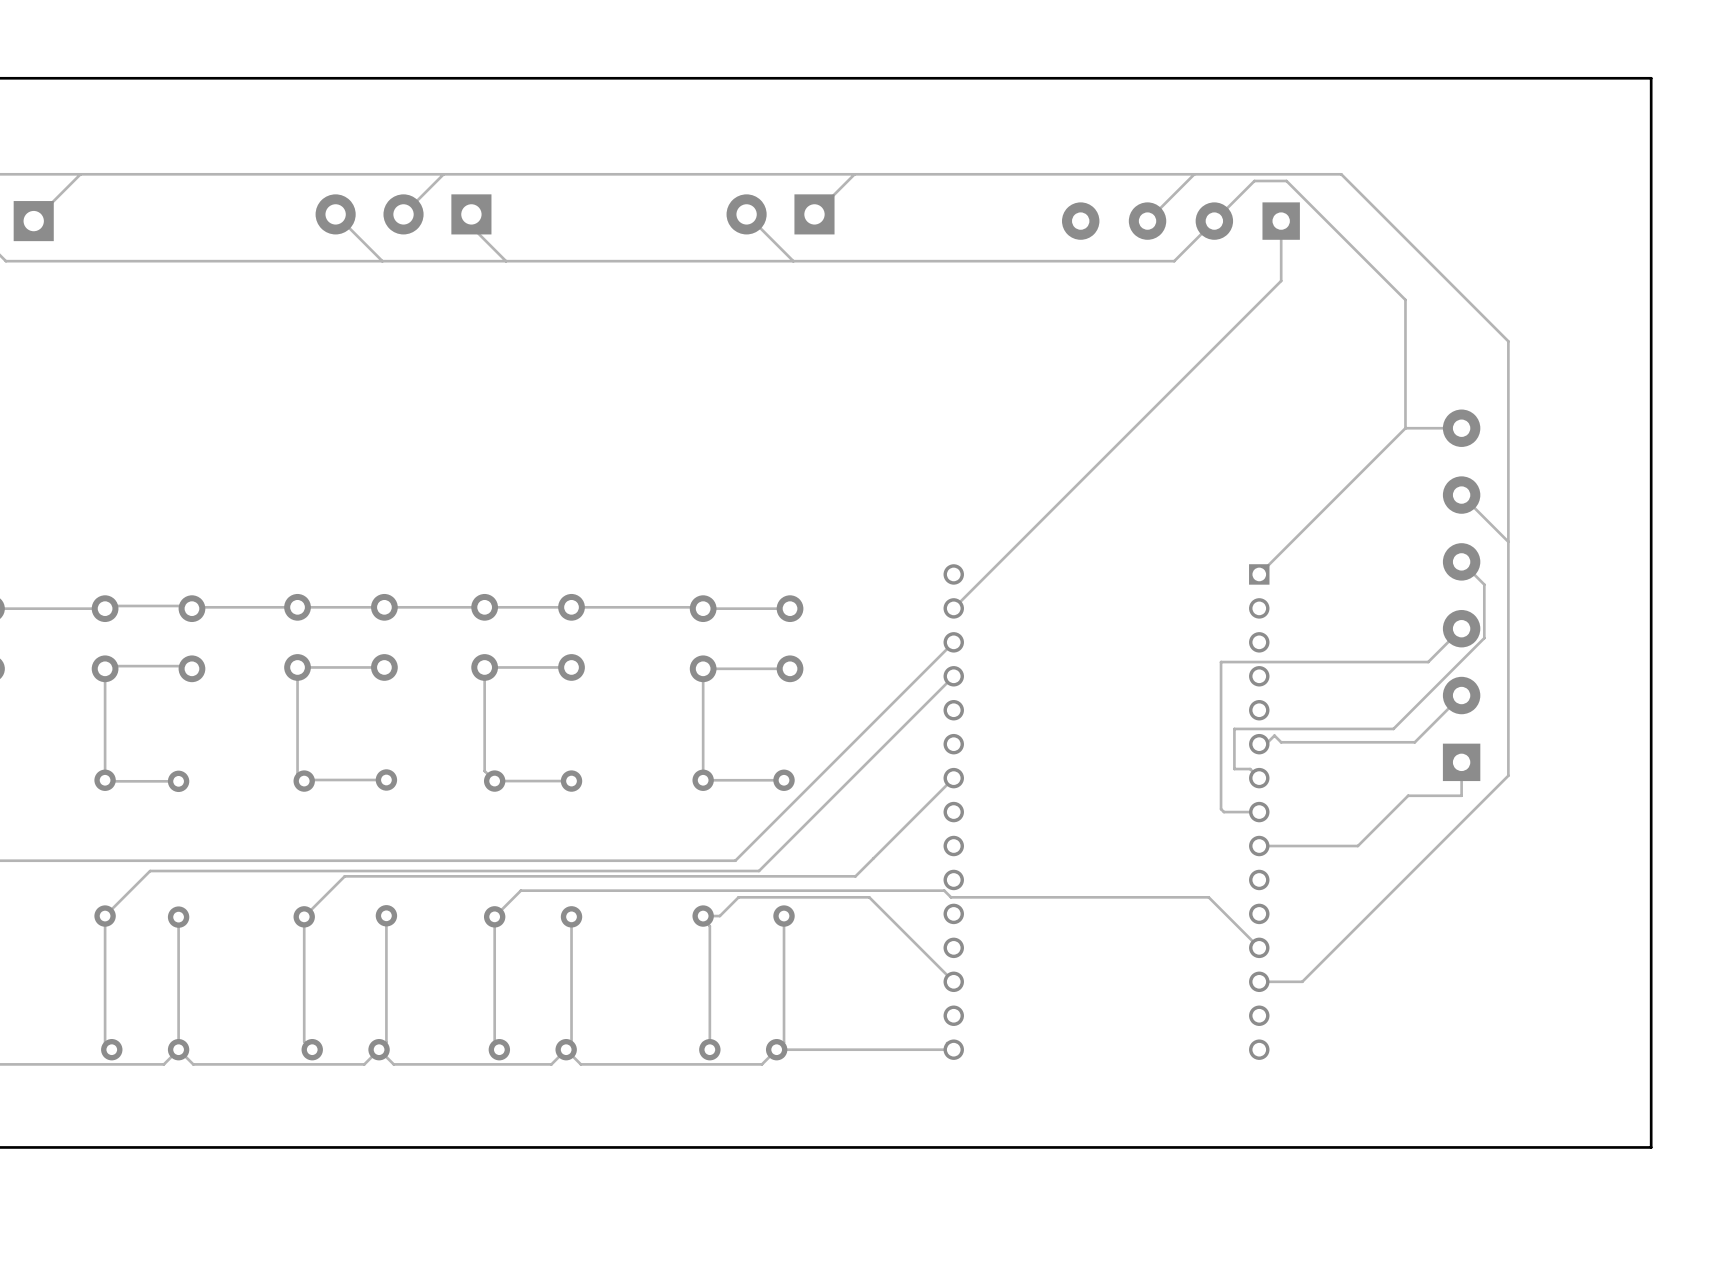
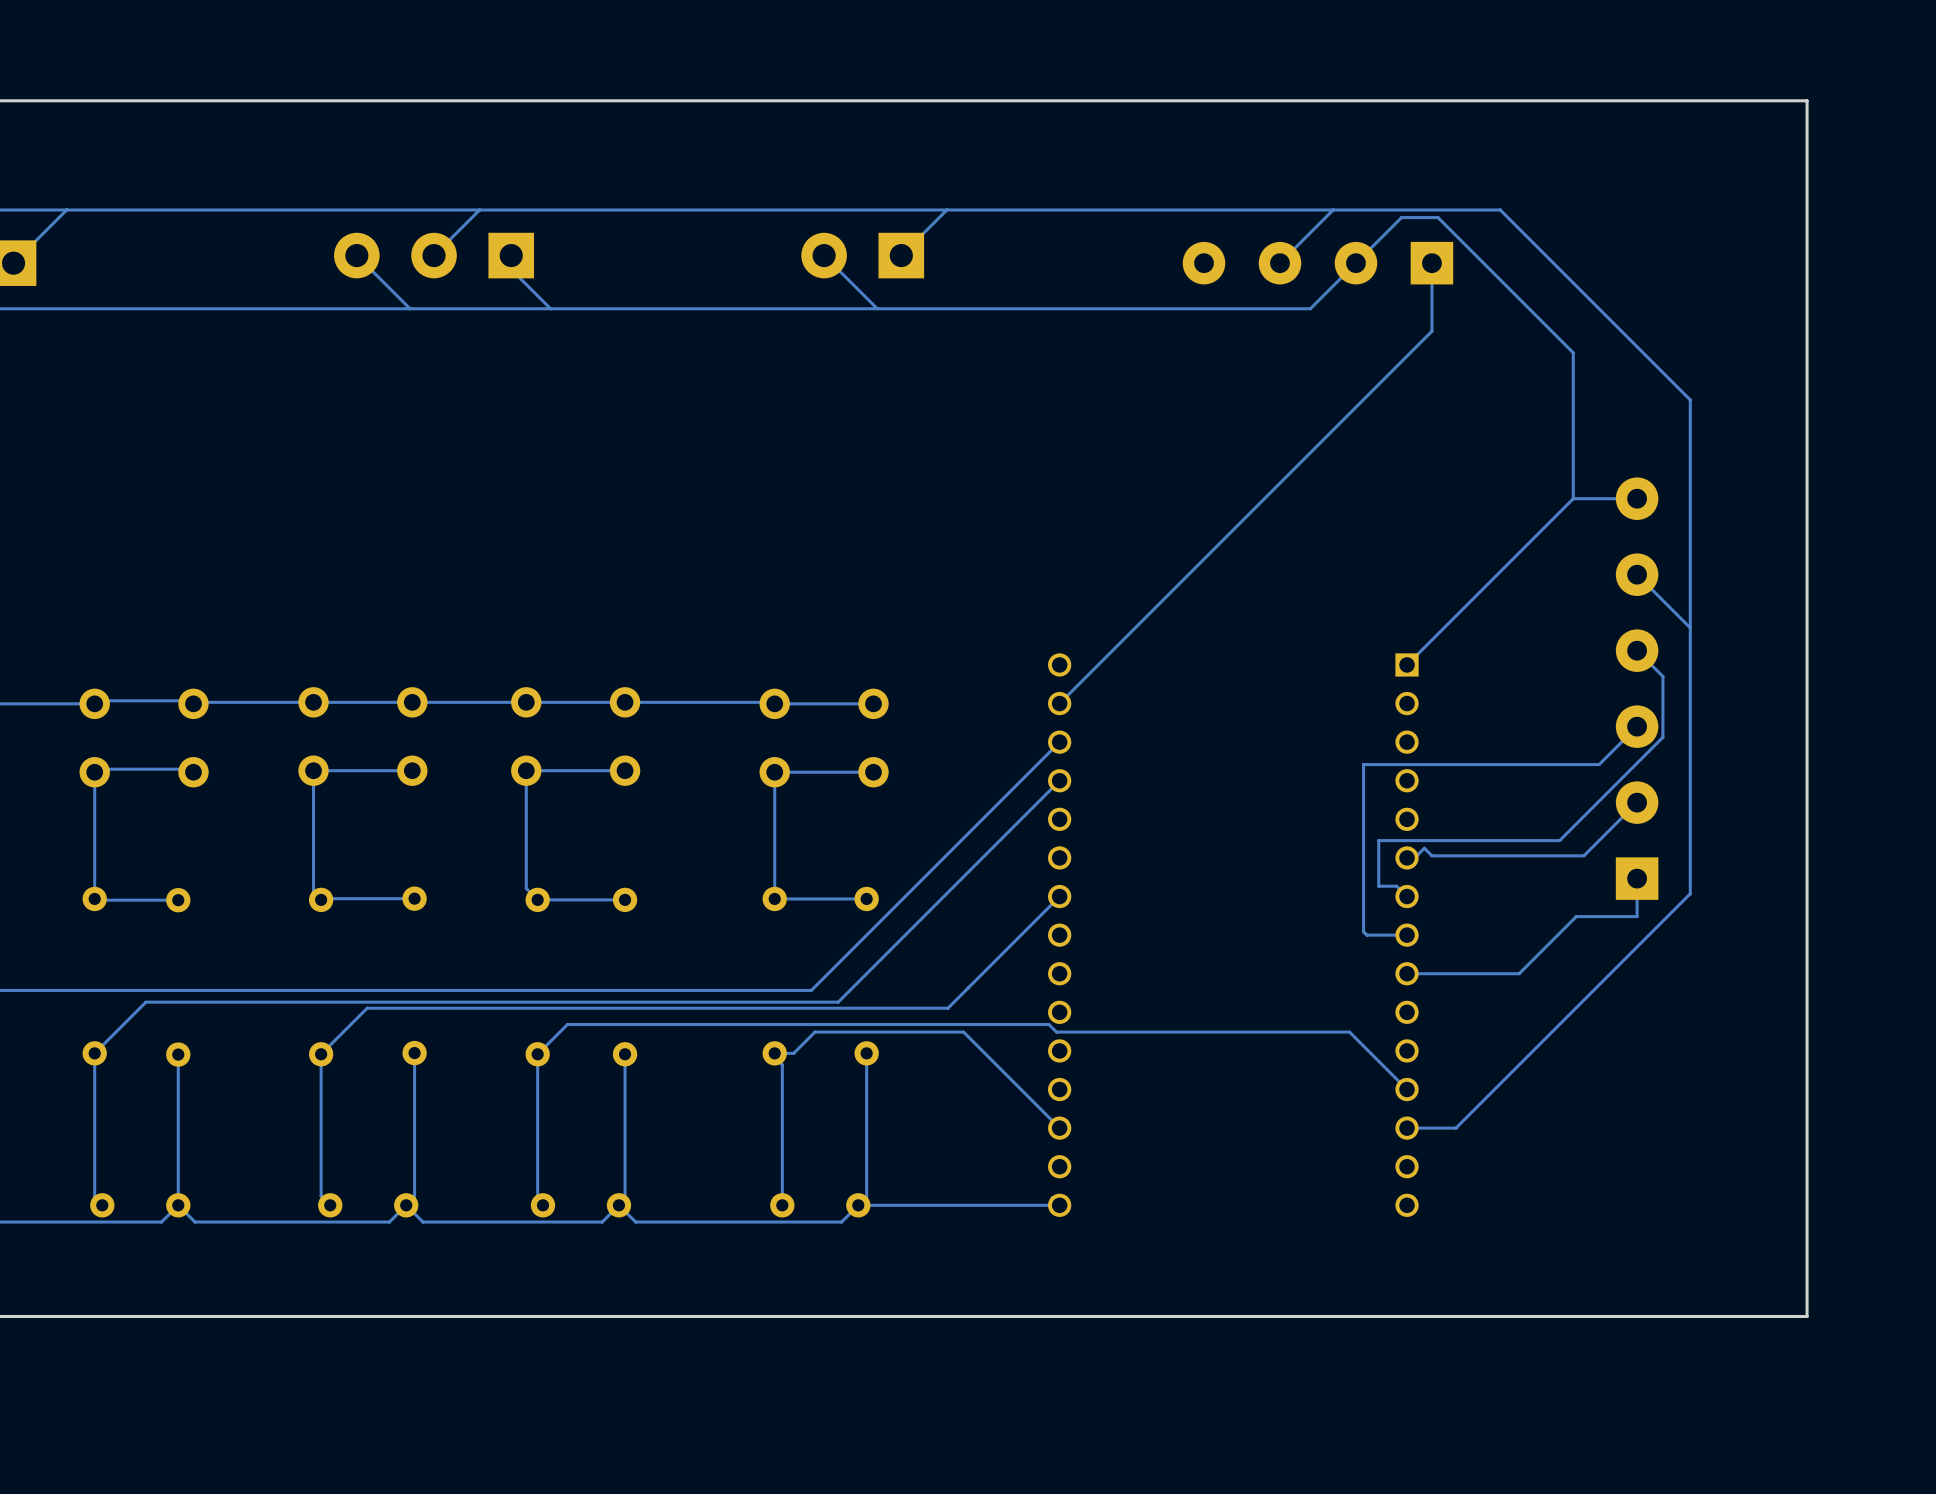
board edge: (1611, 78) (1651, 78) (1651, 1147) (1611, 1147) -> (1807, 100) (1807, 1316)

